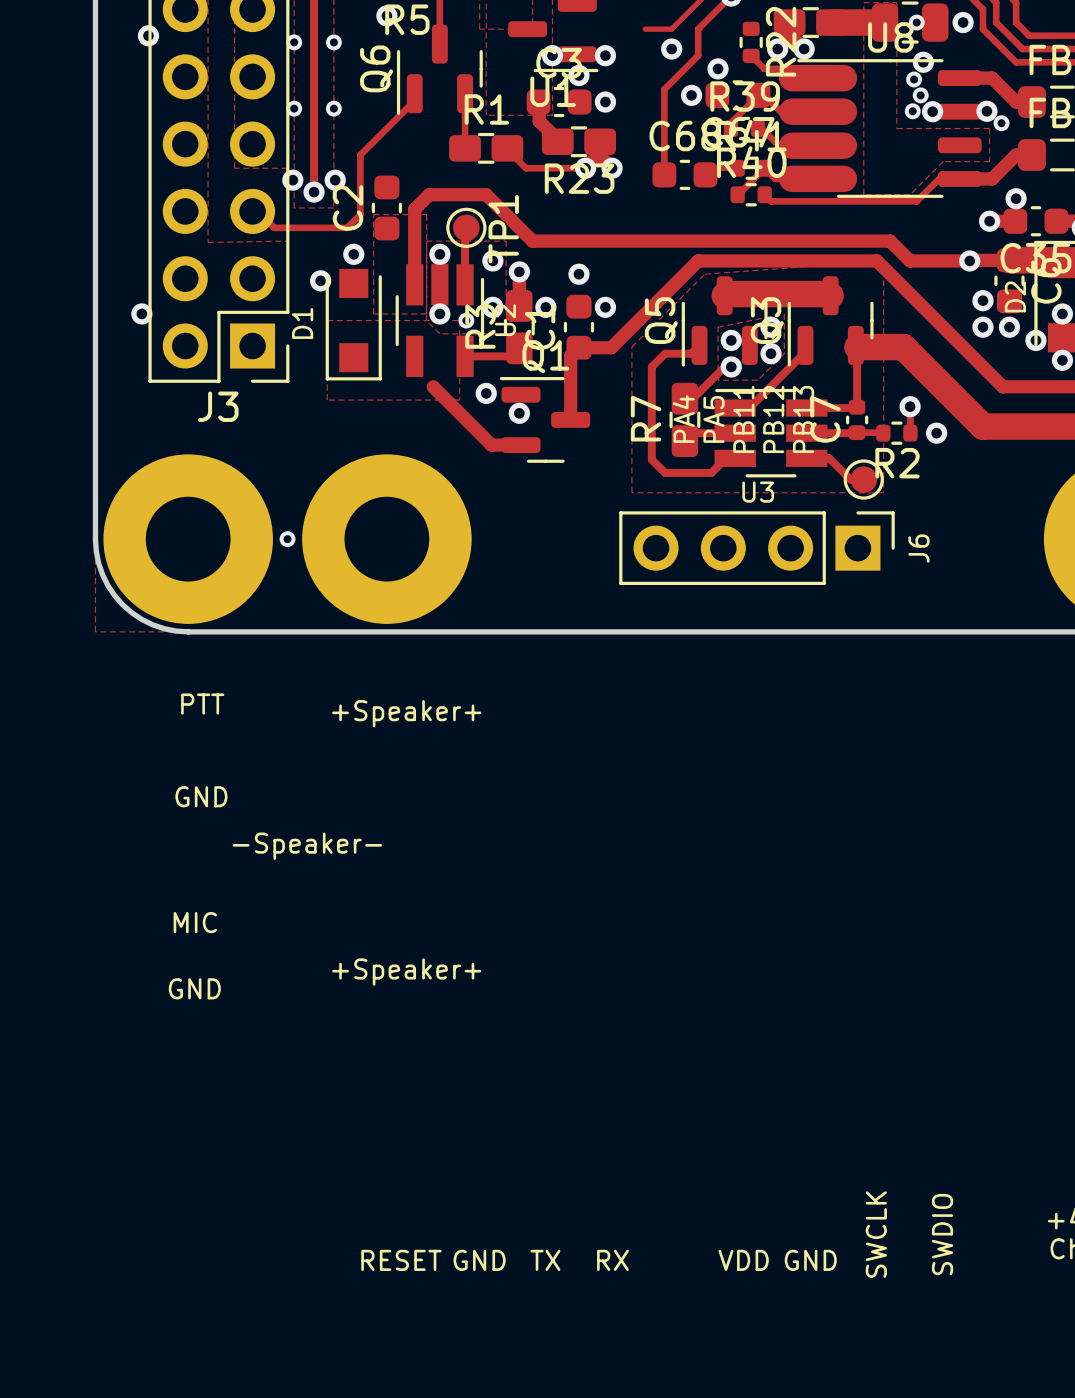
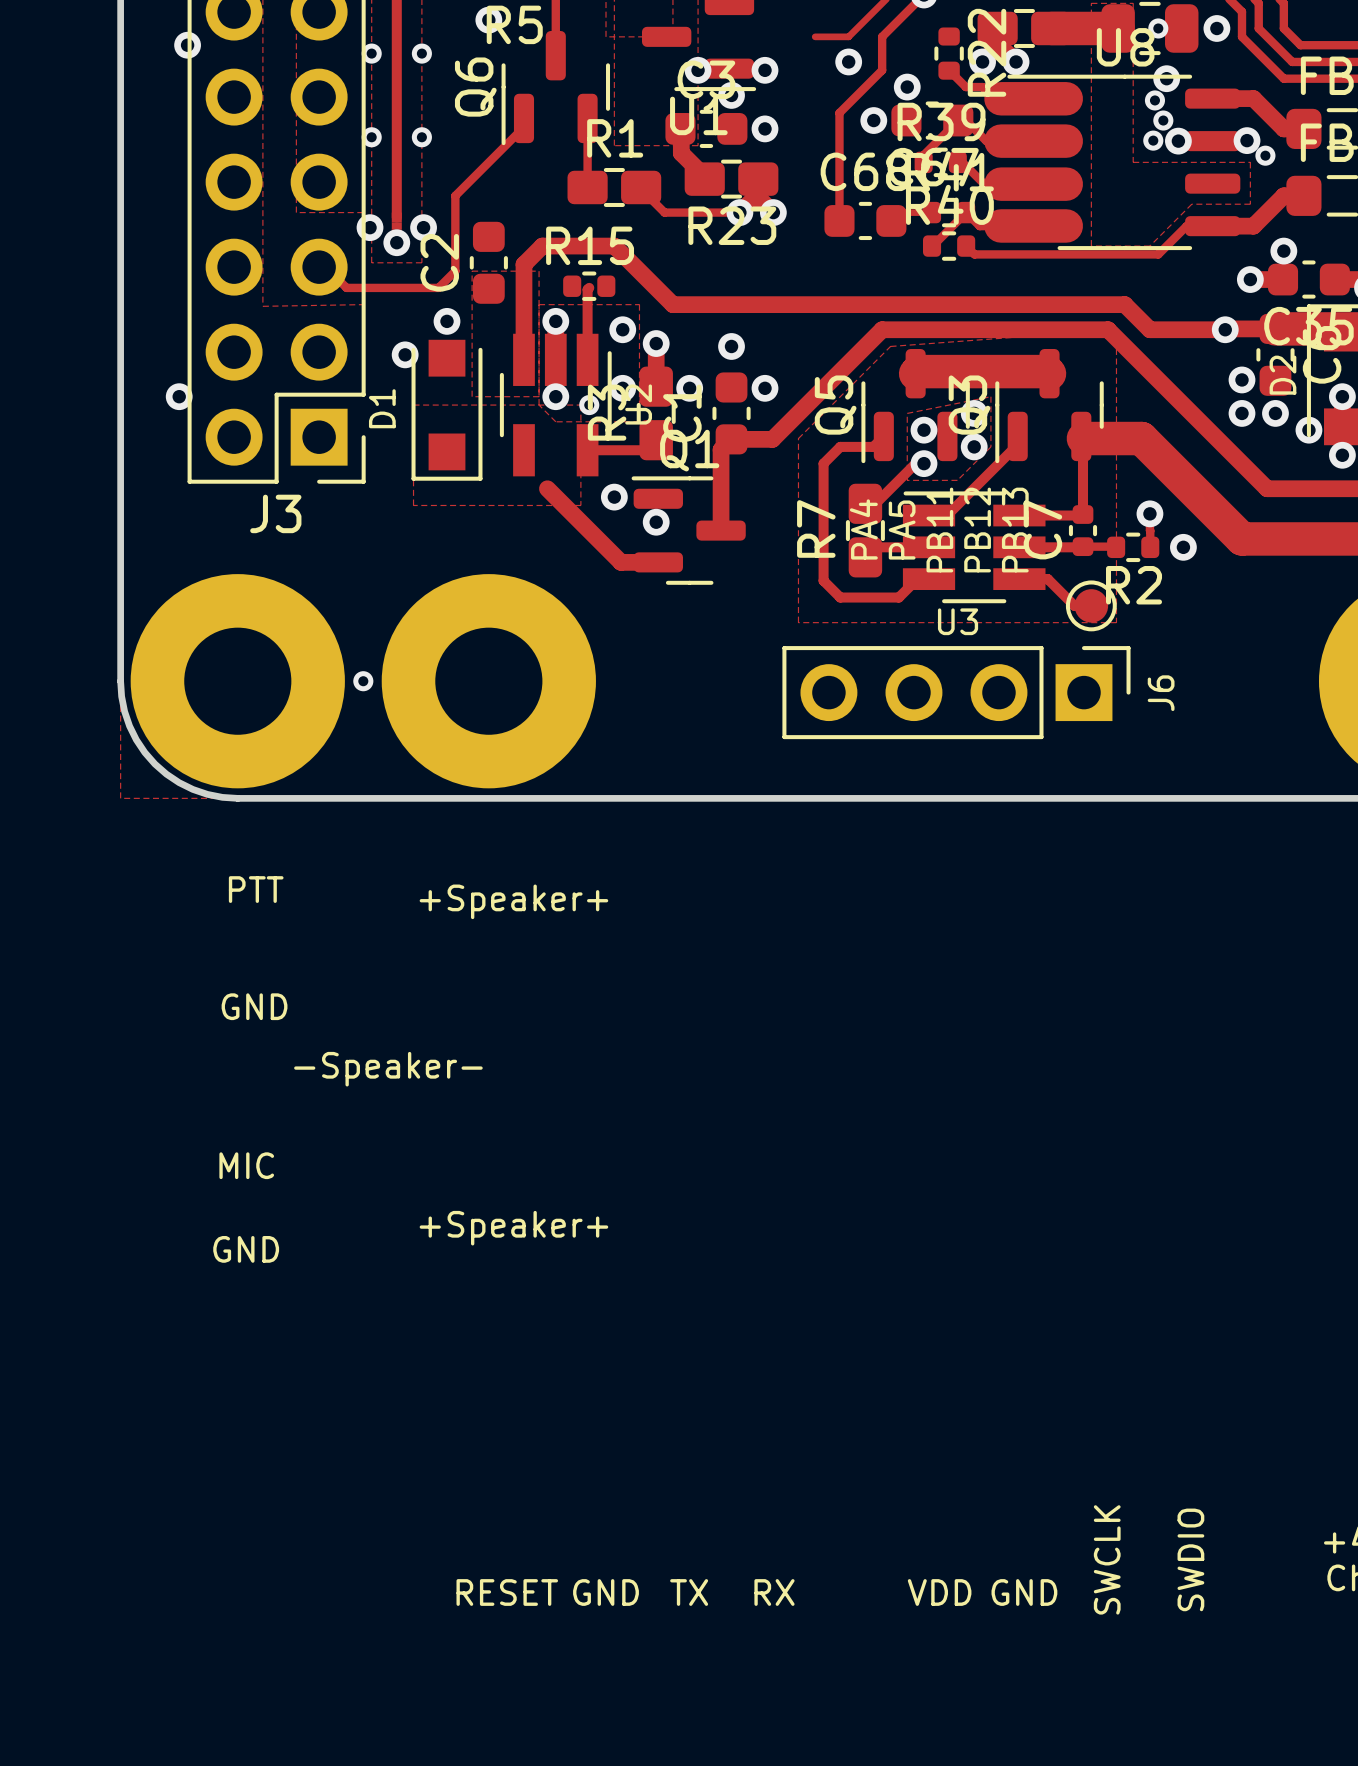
R15: none -> (589, 286)
TP1: (466, 227) -> none

